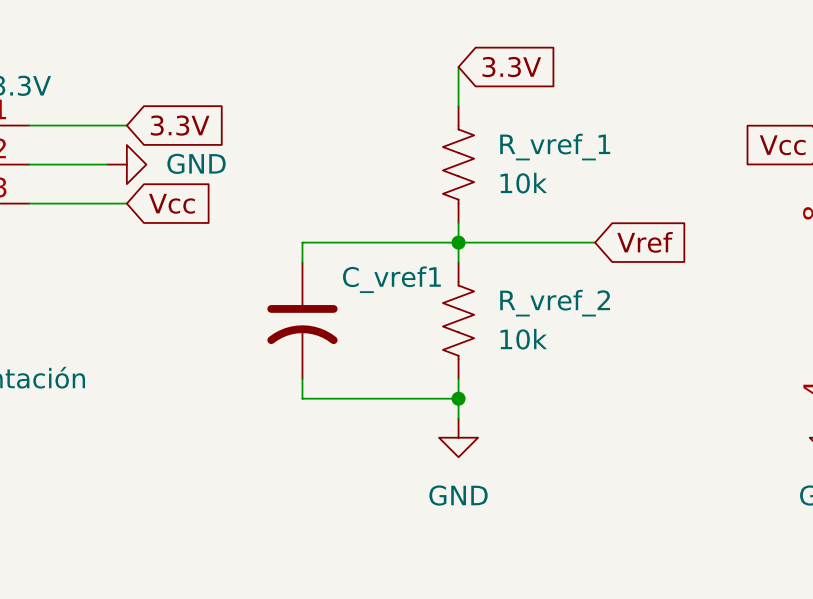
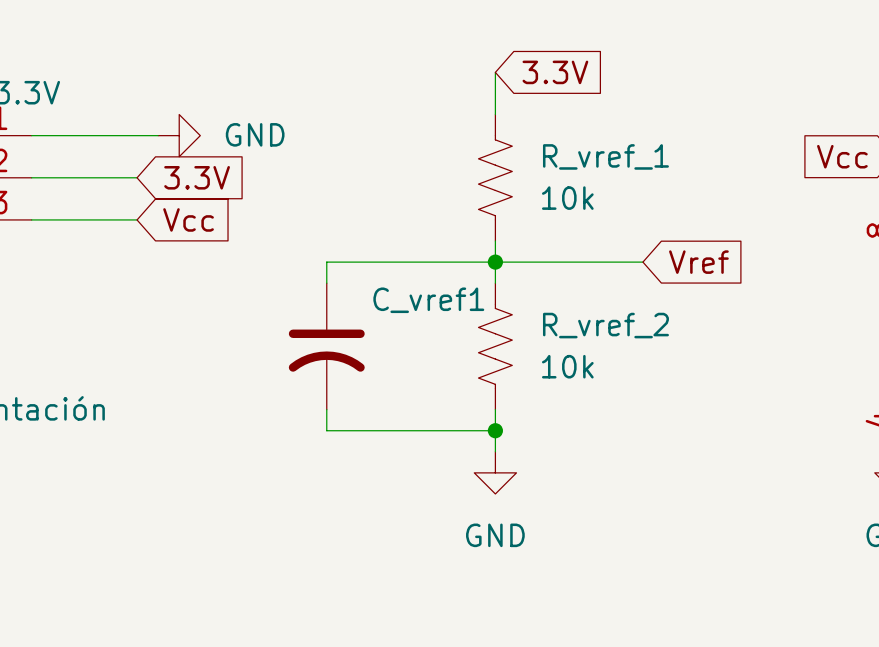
wire: none -> (137, 135) (158, 135)
global label position: 3.3V (180, 125) -> 3.3V (197, 177)
power symbol position: GND (126, 164) -> GND (179, 135)

